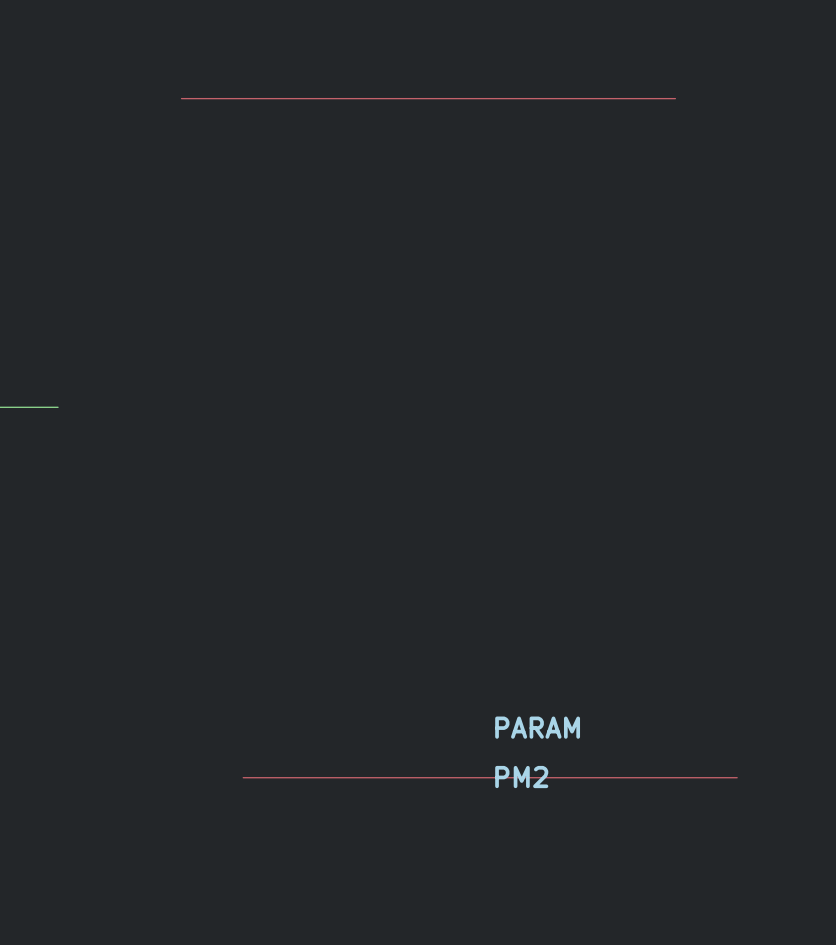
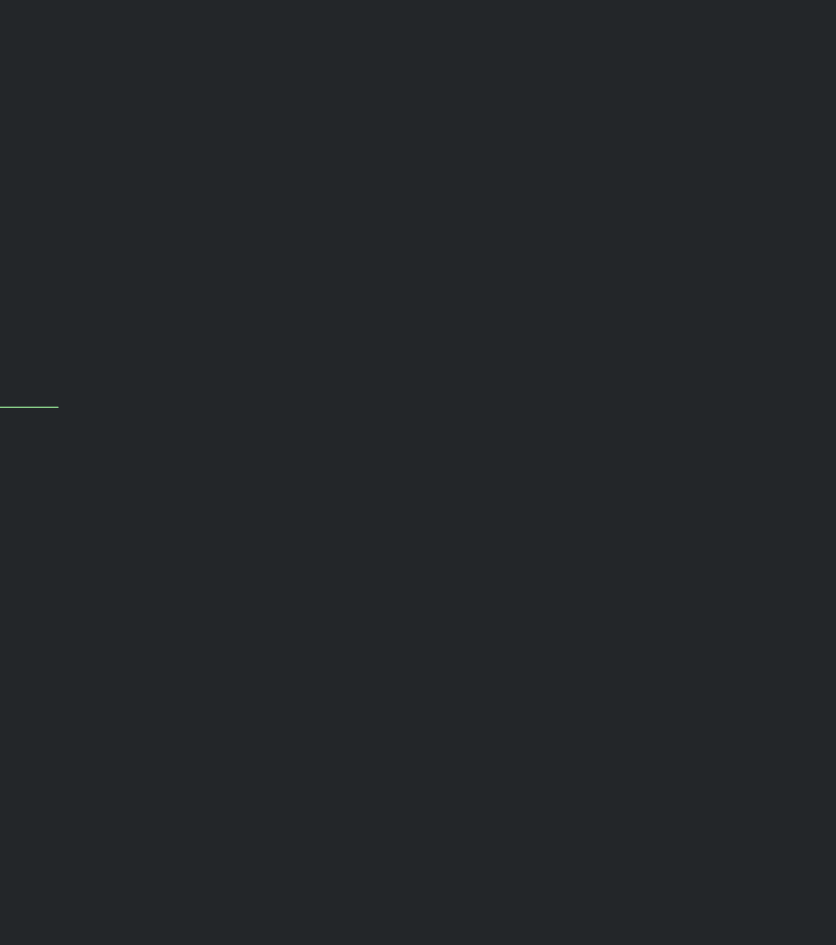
part: (428, 98) -> none
PM2: PARAM (490, 777) -> none

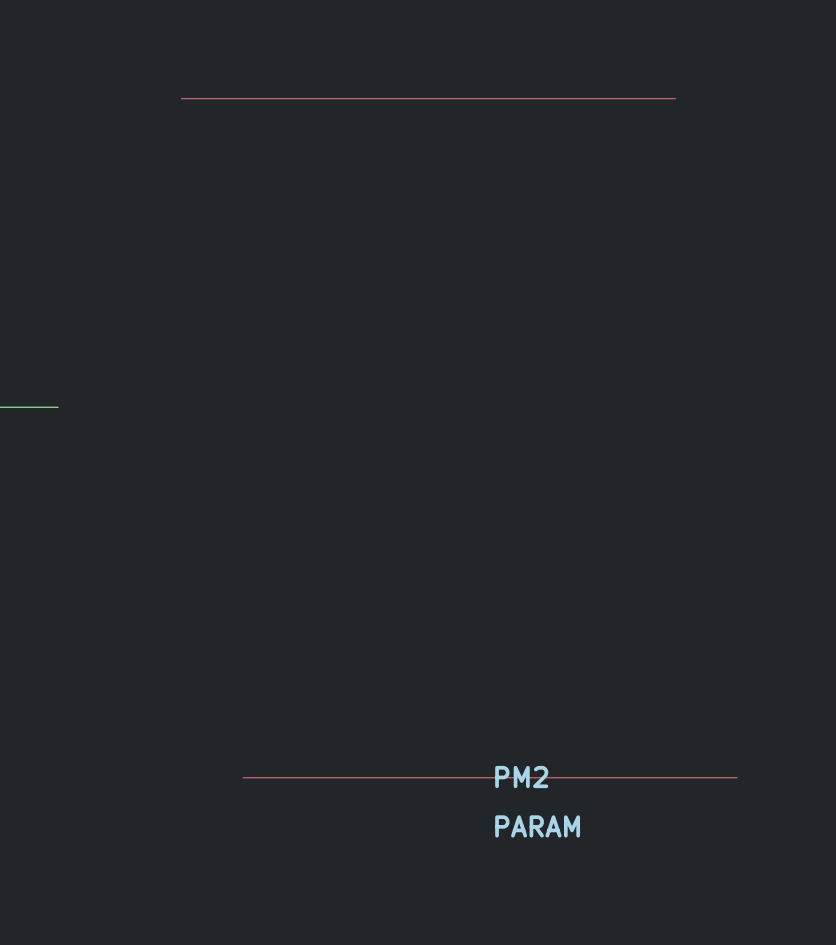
part: none -> (428, 98)
PM2: none -> PARAM (490, 777)

